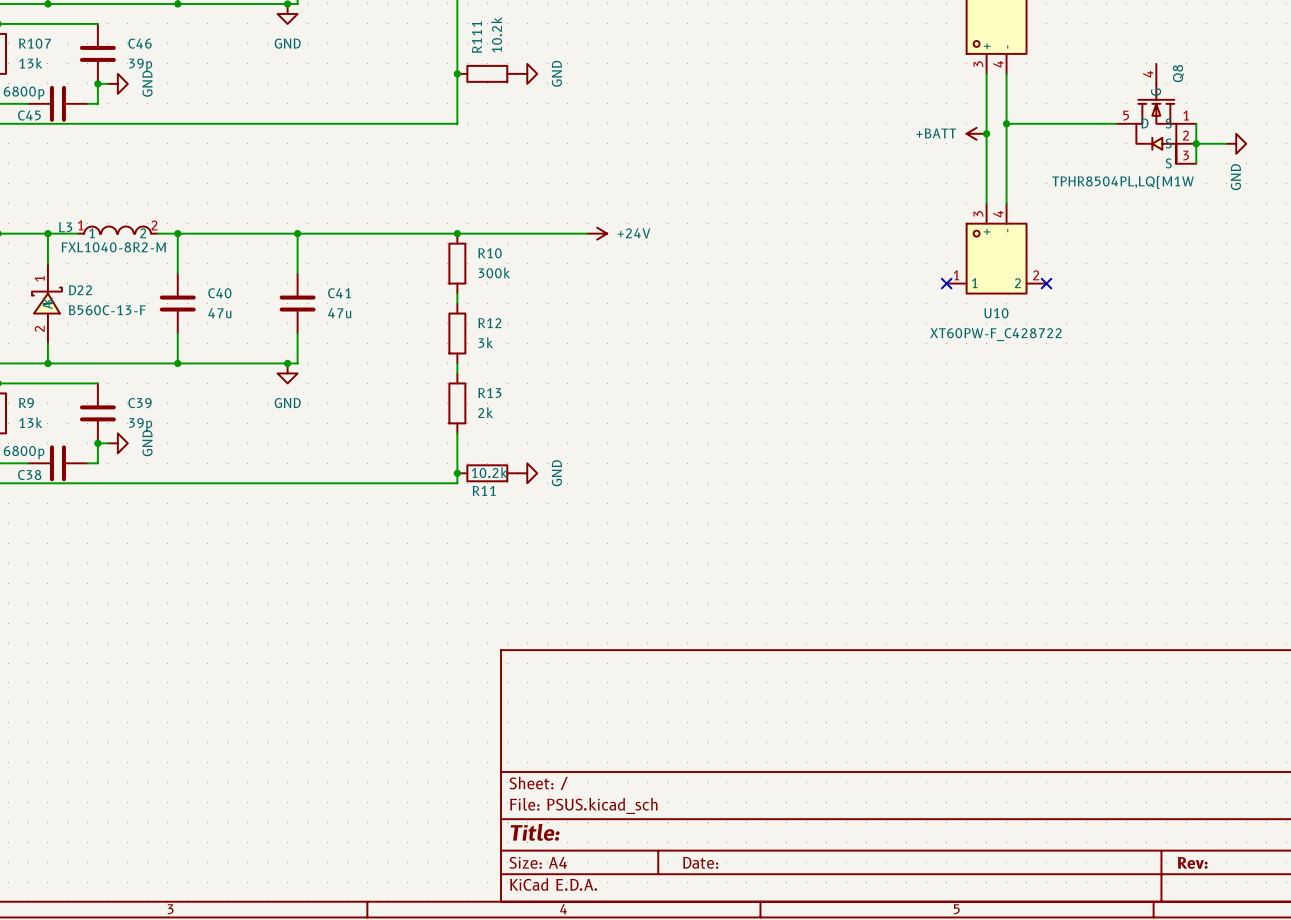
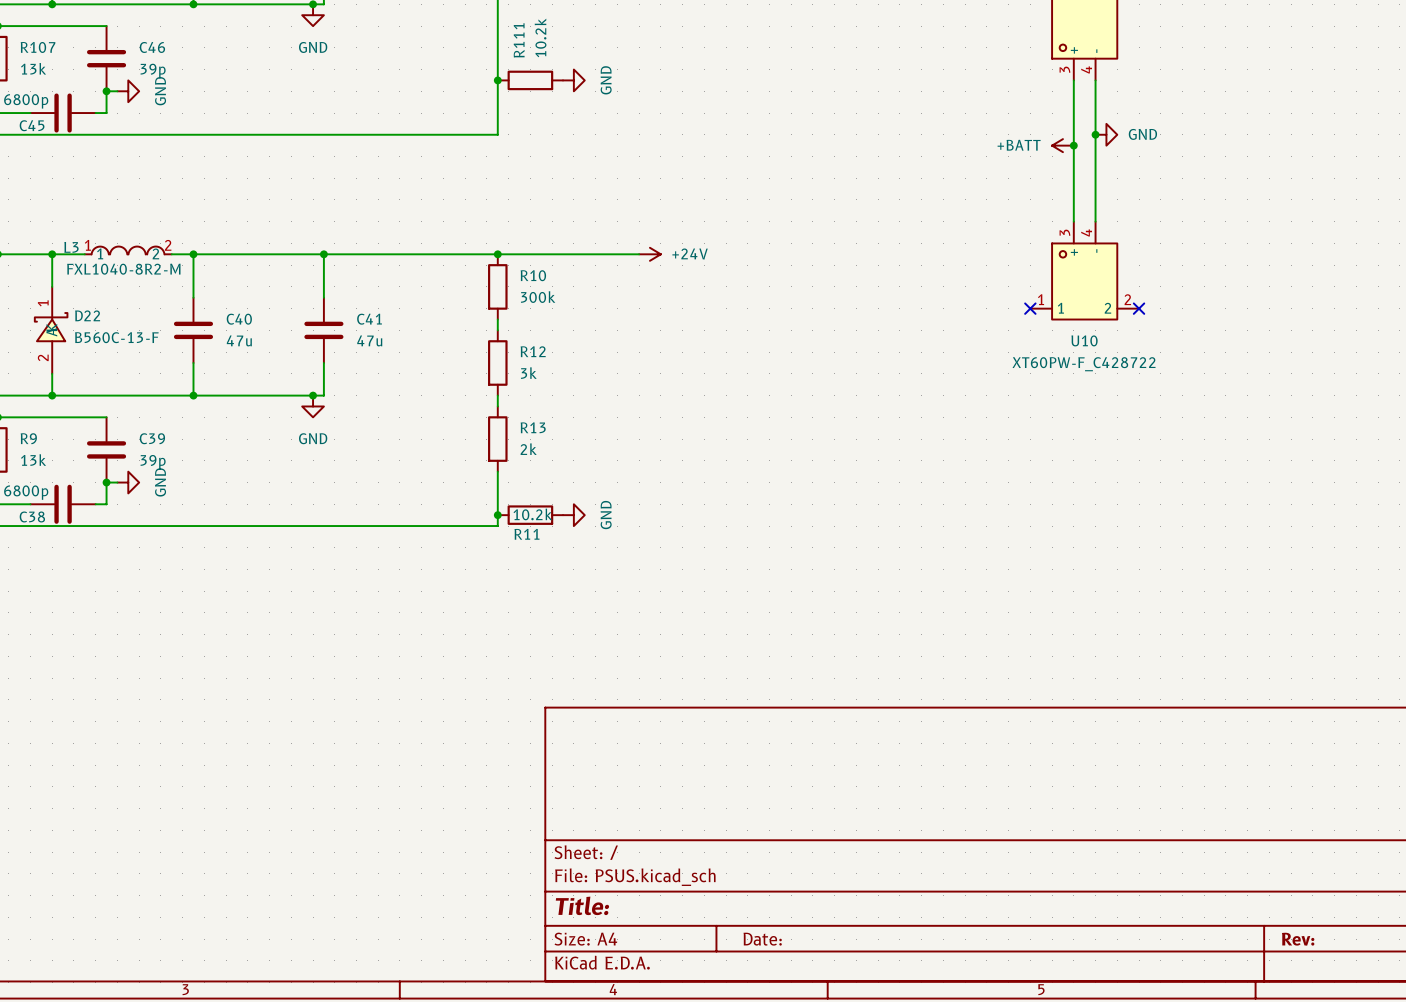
Q8: TPHR8504PL,LQ(M1W (1156, 113) -> none
wire: (1006, 123) (1116, 123) -> none
power symbol: none -> GND (1106, 134)
wire: (1196, 123) (1196, 163) -> none
wire: (1196, 143) (1226, 143) -> none
junction: (1196, 143) -> none
power symbol: GND (1236, 143) -> none

